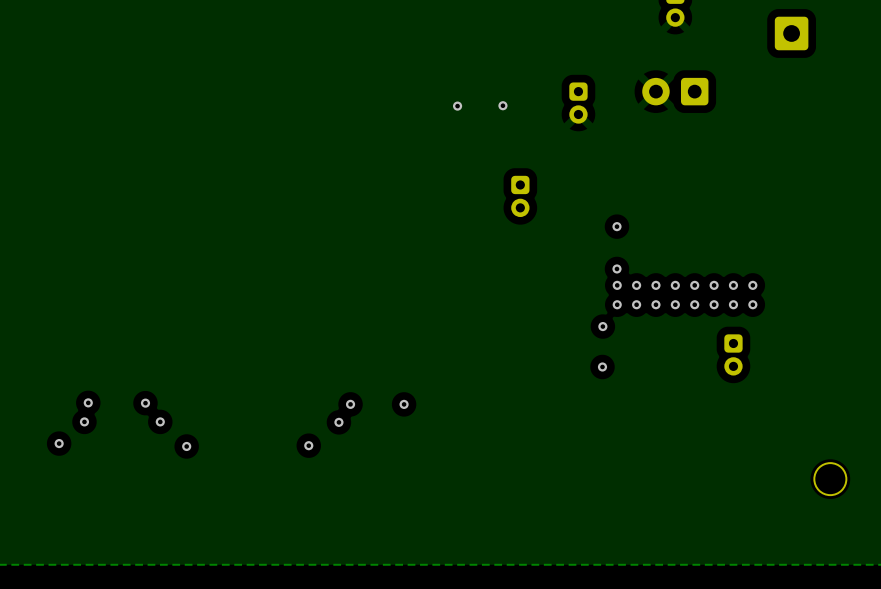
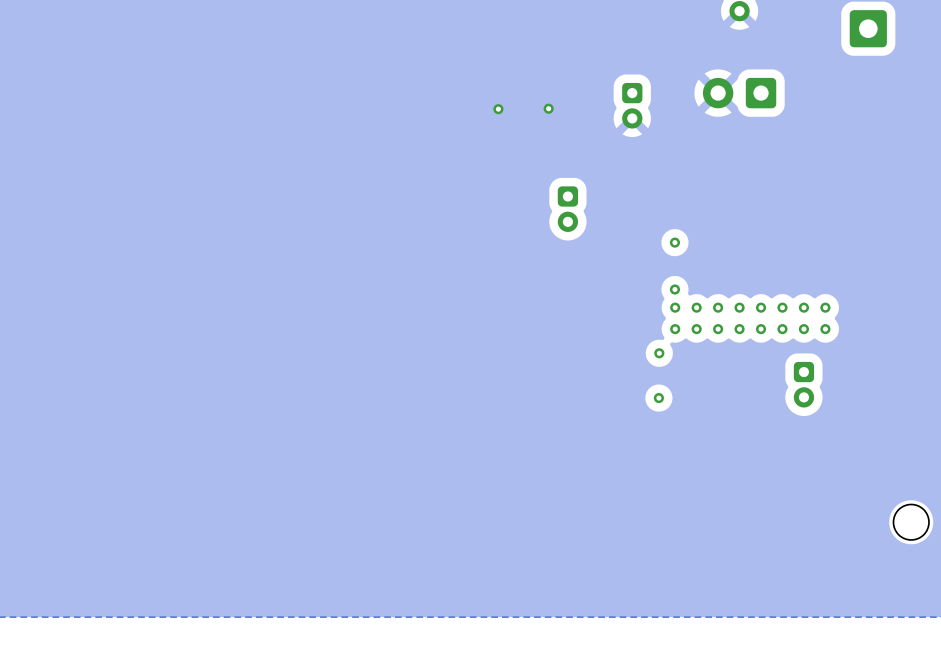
via: (88, 402) -> none
via: (145, 403) -> none
via: (350, 404) -> none
via: (404, 404) -> none
via: (84, 421) -> none
via: (160, 421) -> none
via: (338, 422) -> none
via: (59, 443) -> none
via: (308, 445) -> none
via: (186, 446) -> none

